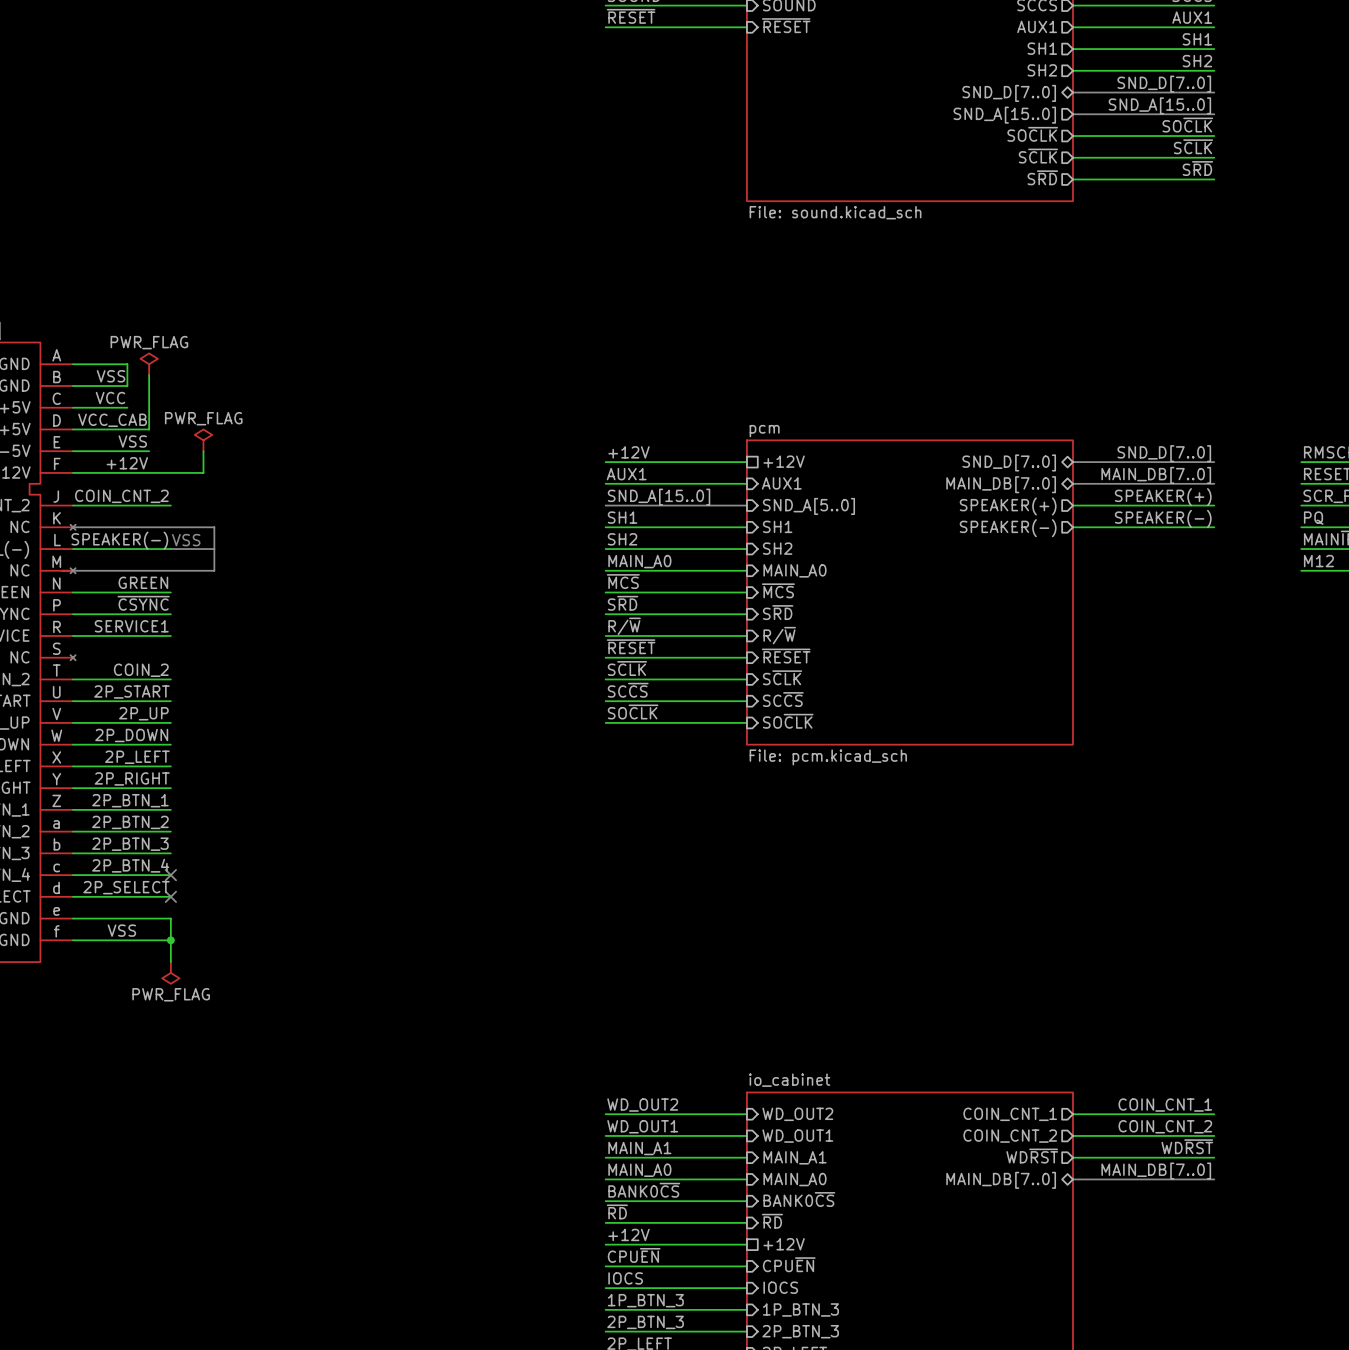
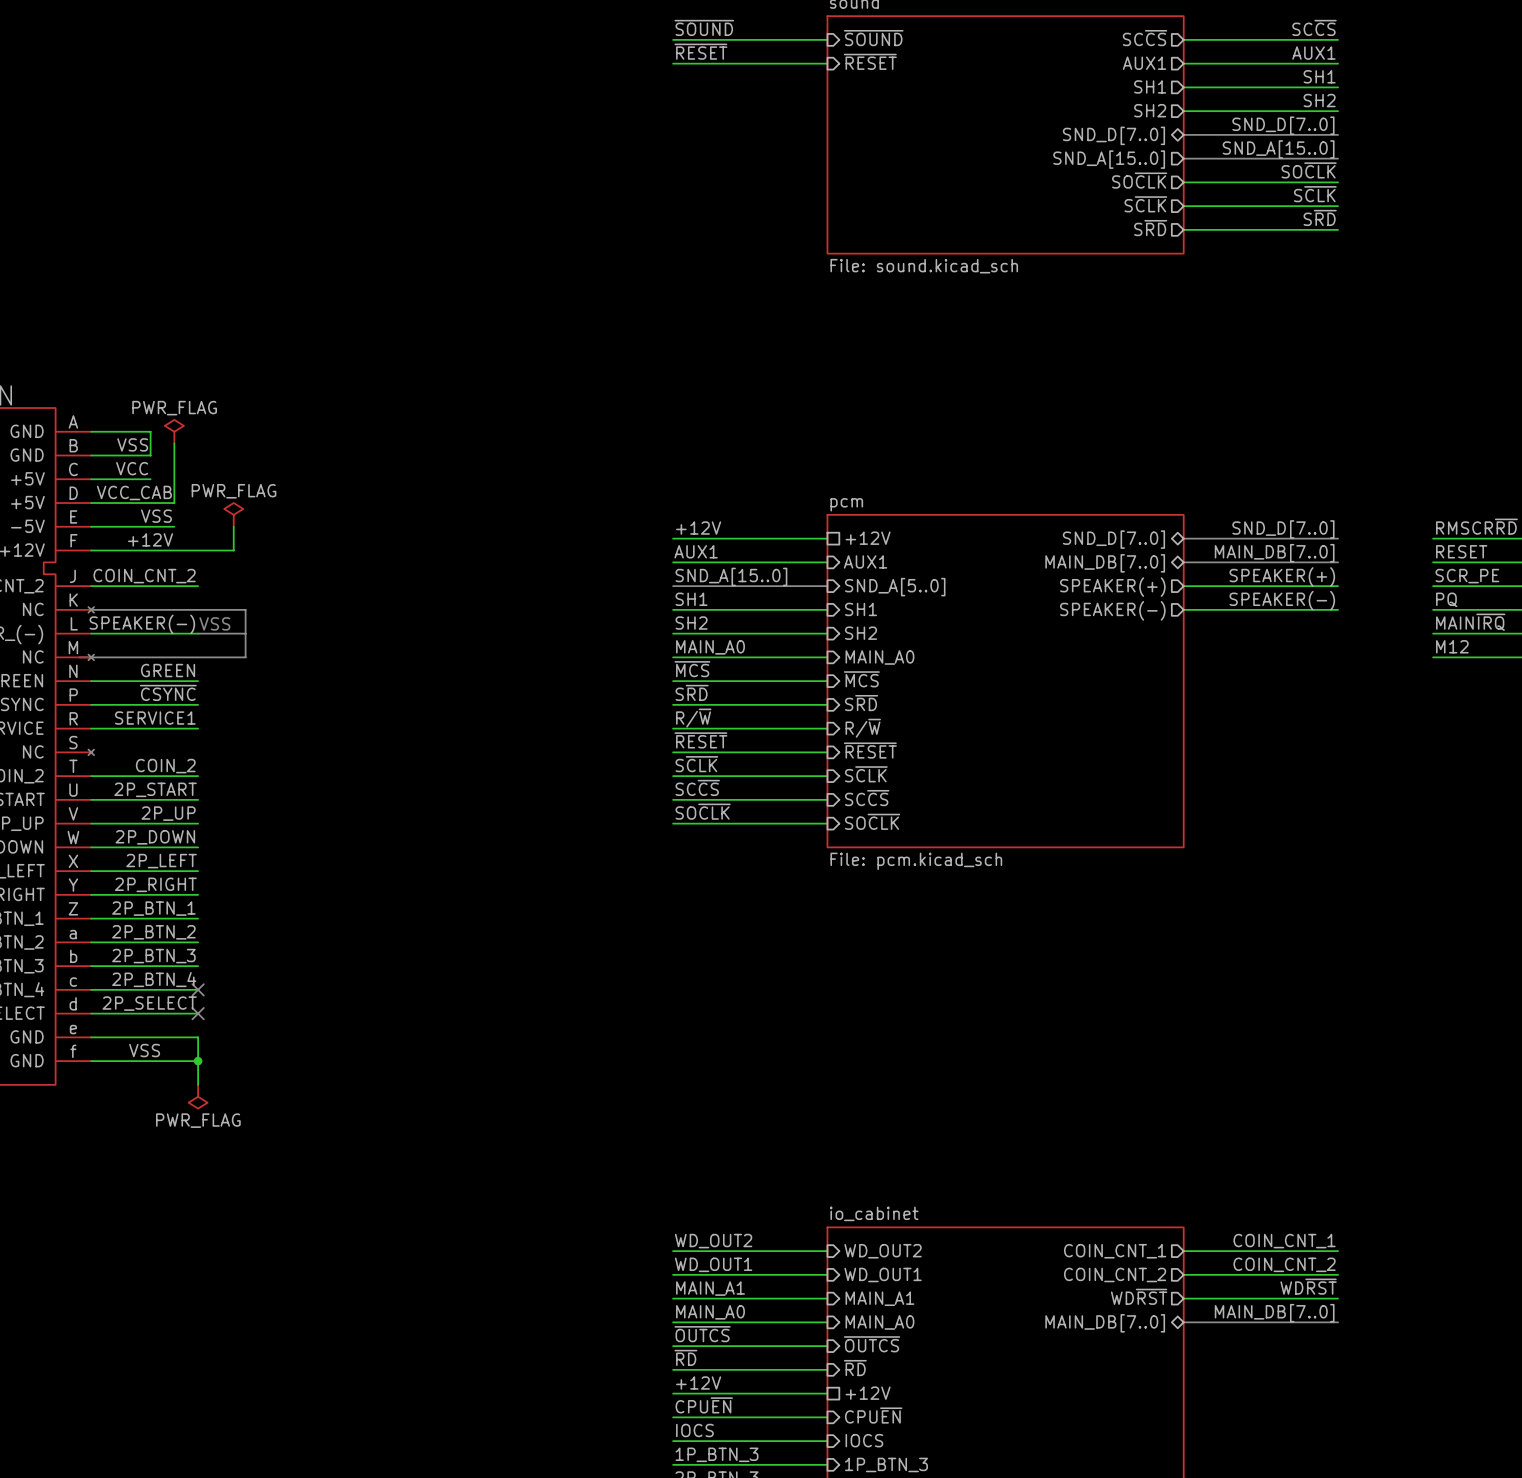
label: BANK0~{CS} (644, 1190) -> ~{OUTCS} (702, 1334)
sheet pin: BANK0~{CS} (799, 1199) -> ~{OUTCS} (872, 1344)

